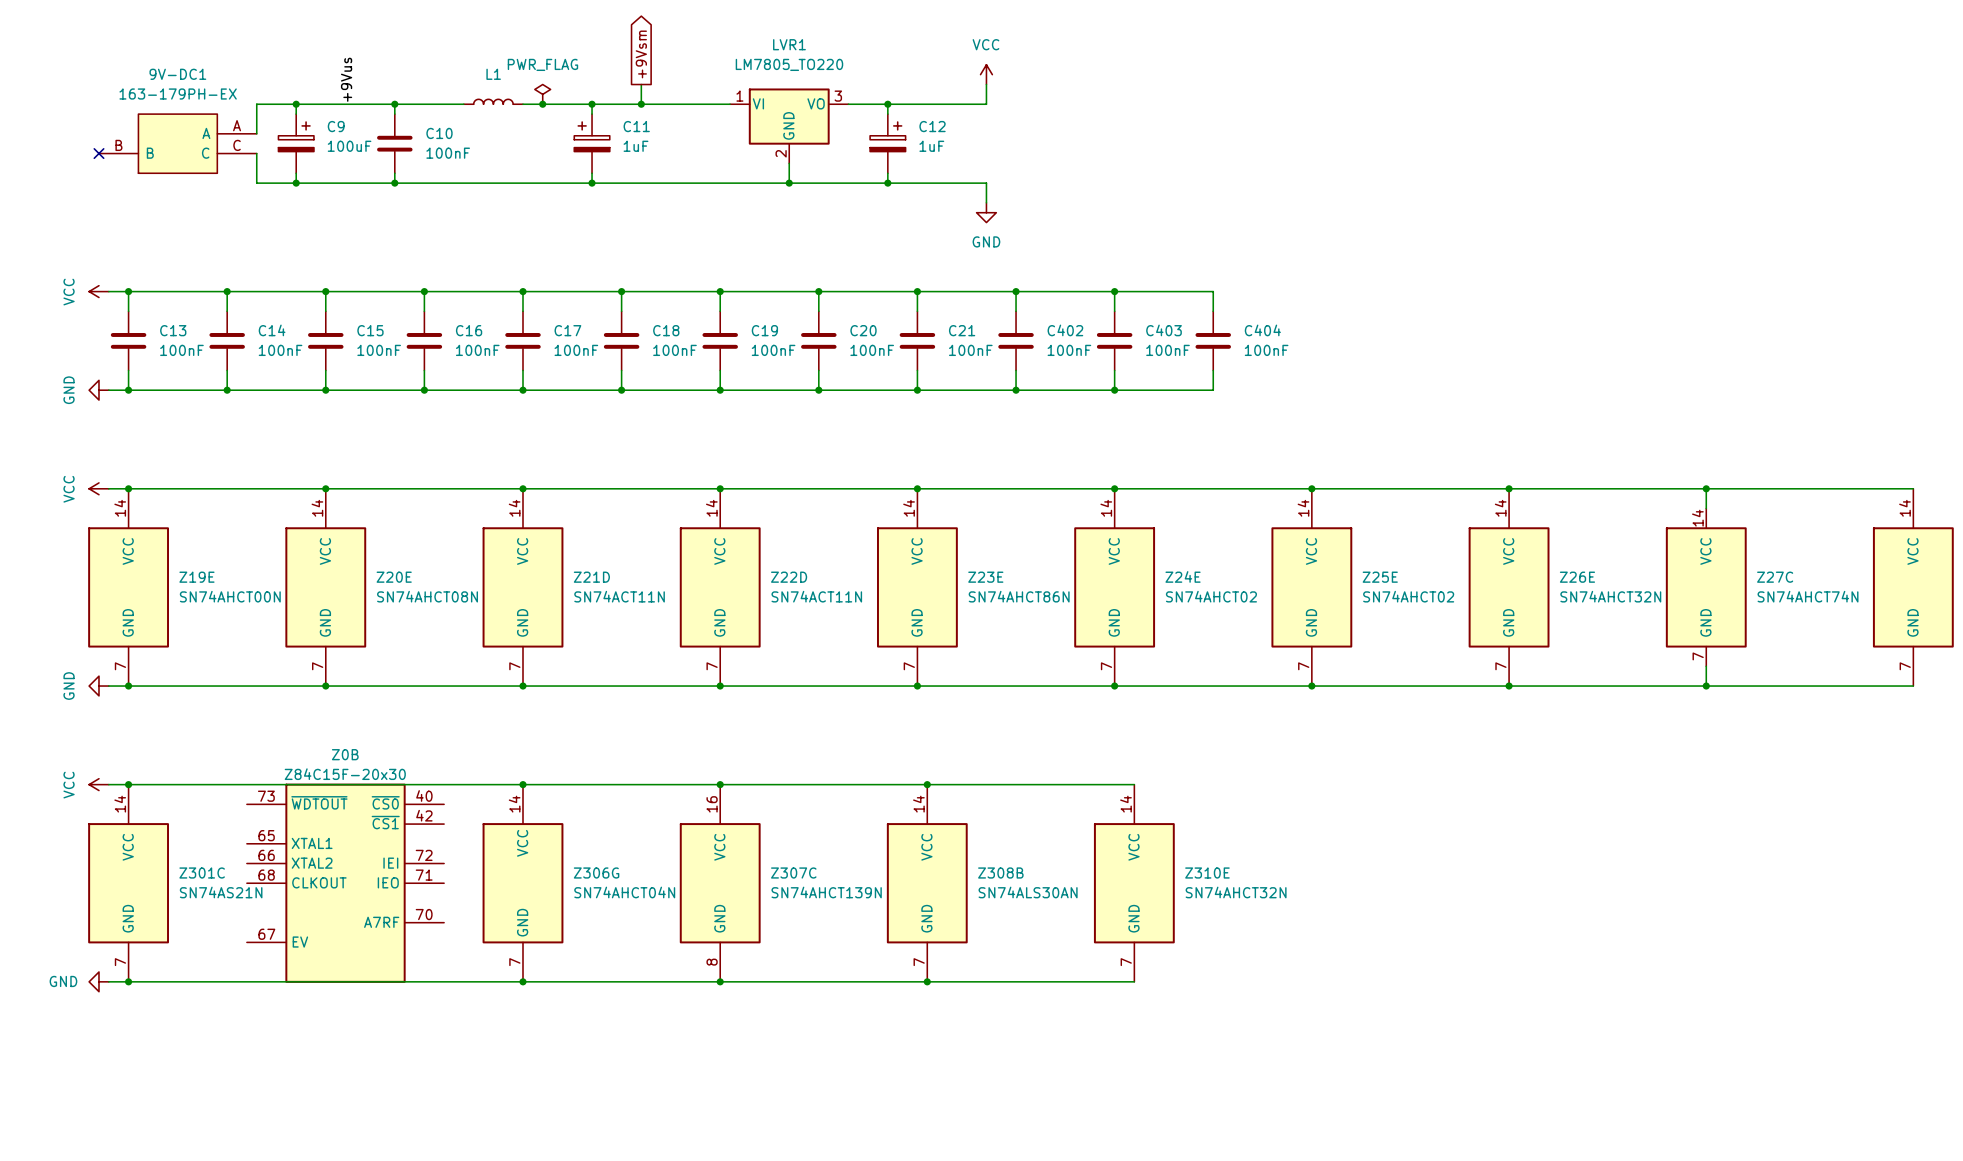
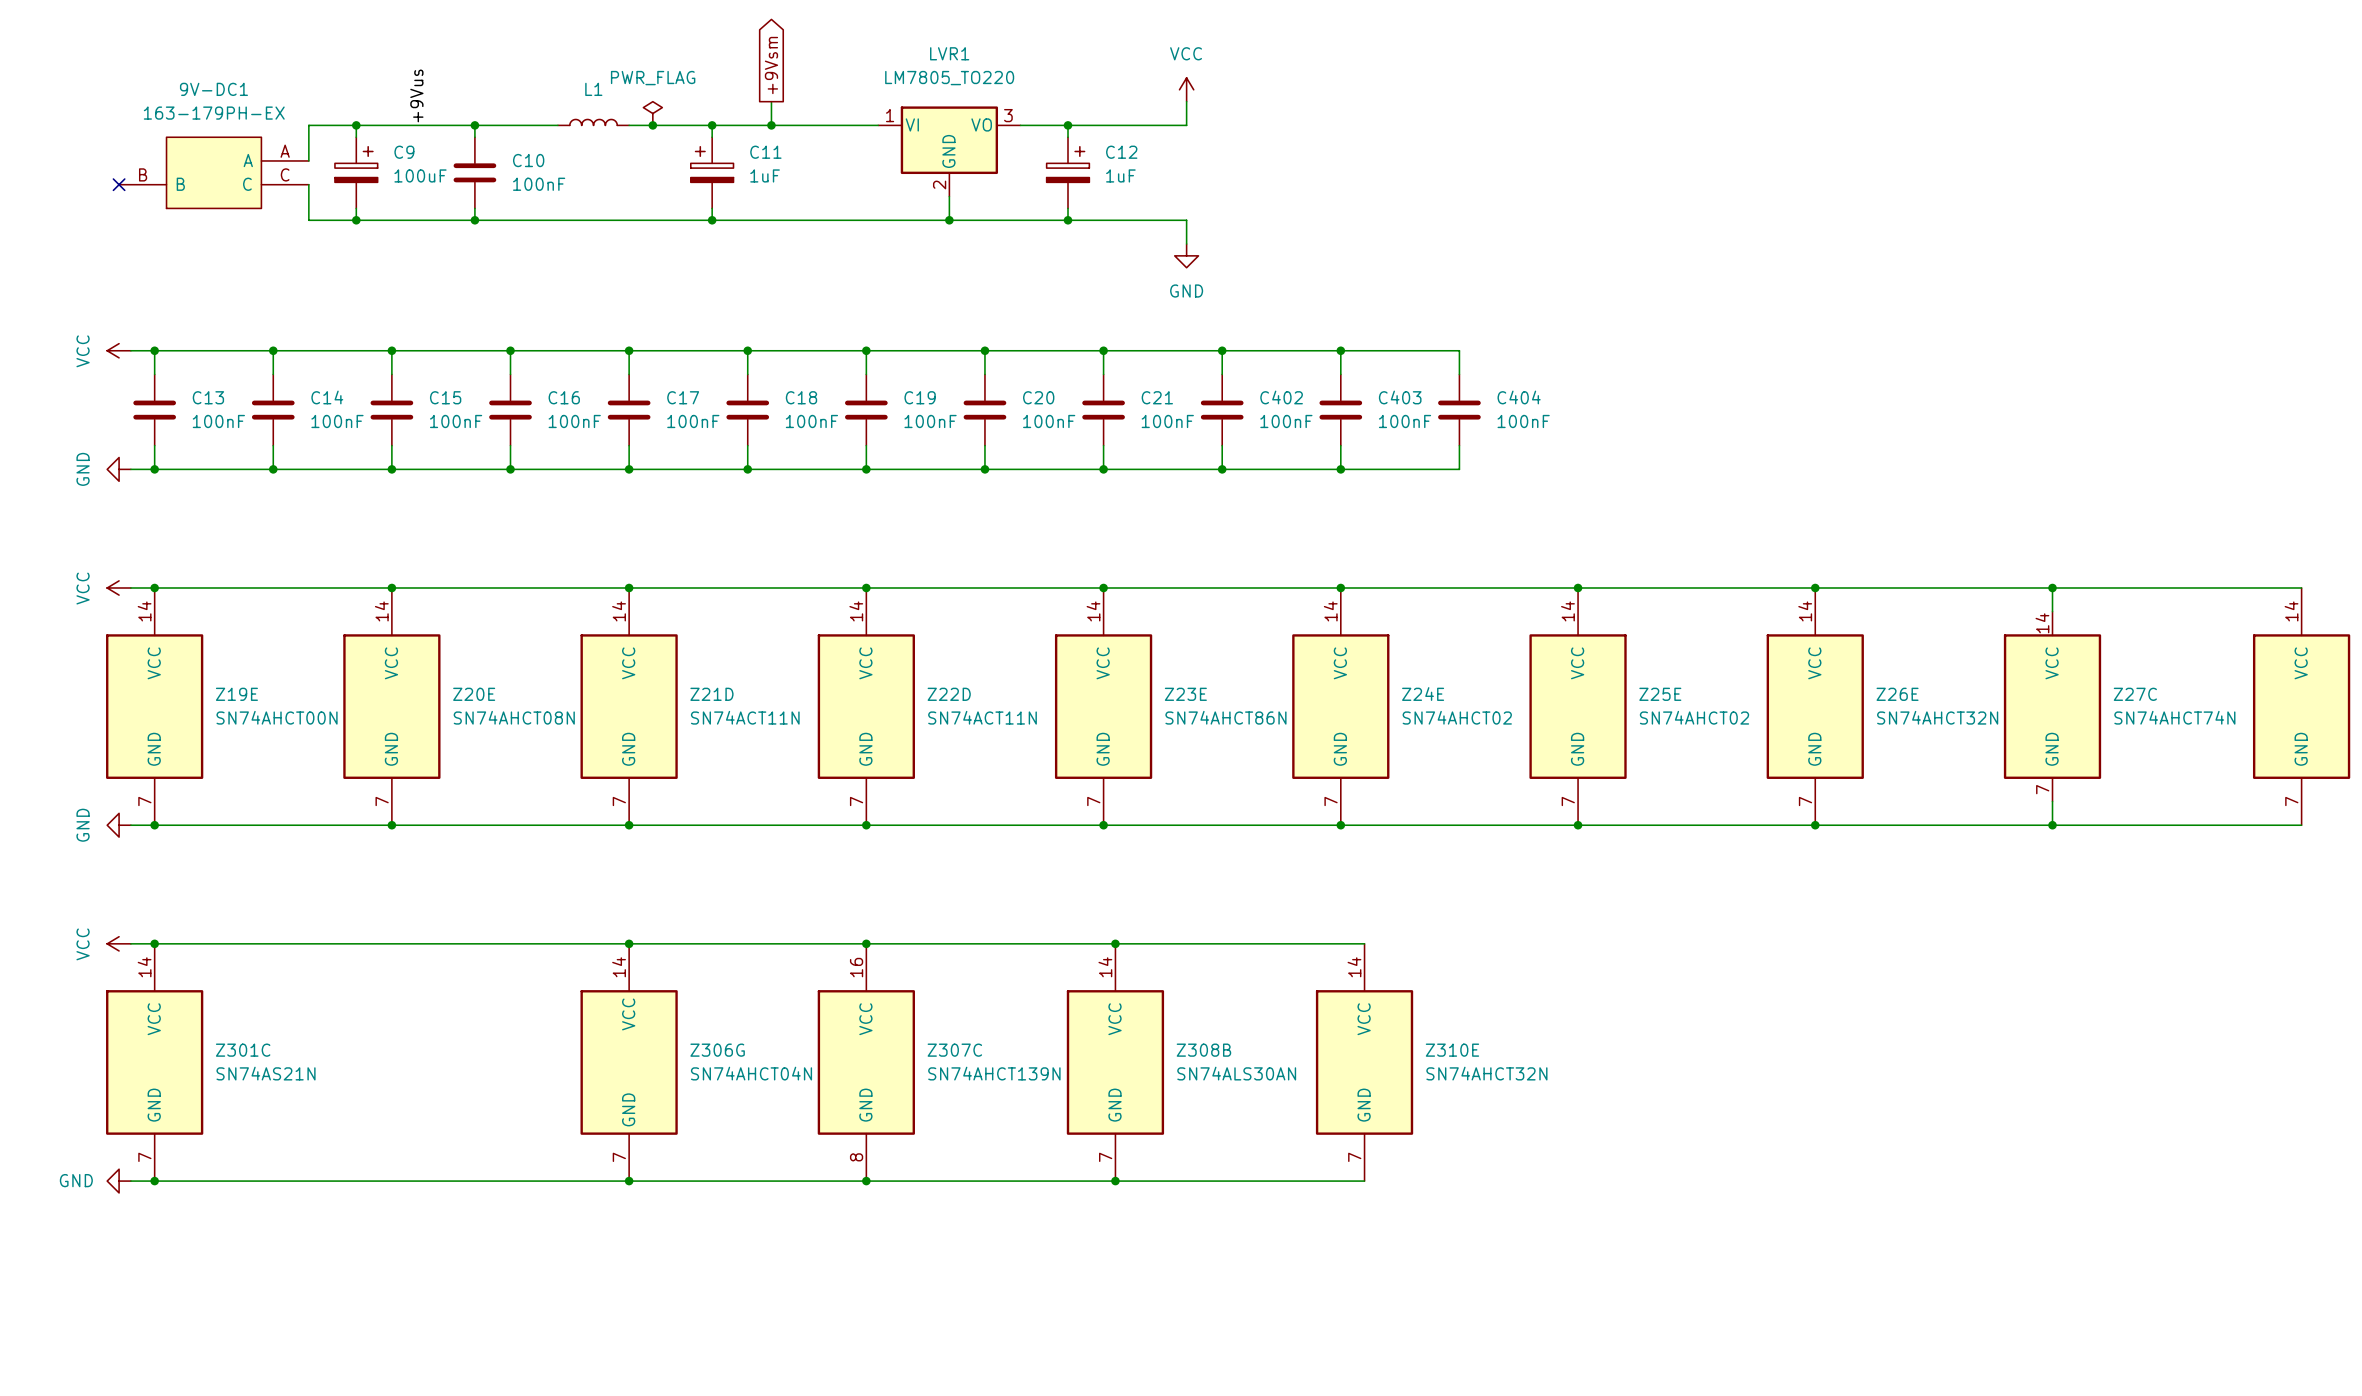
Z0B: Z84C15F-20x30 (345, 883) -> none

